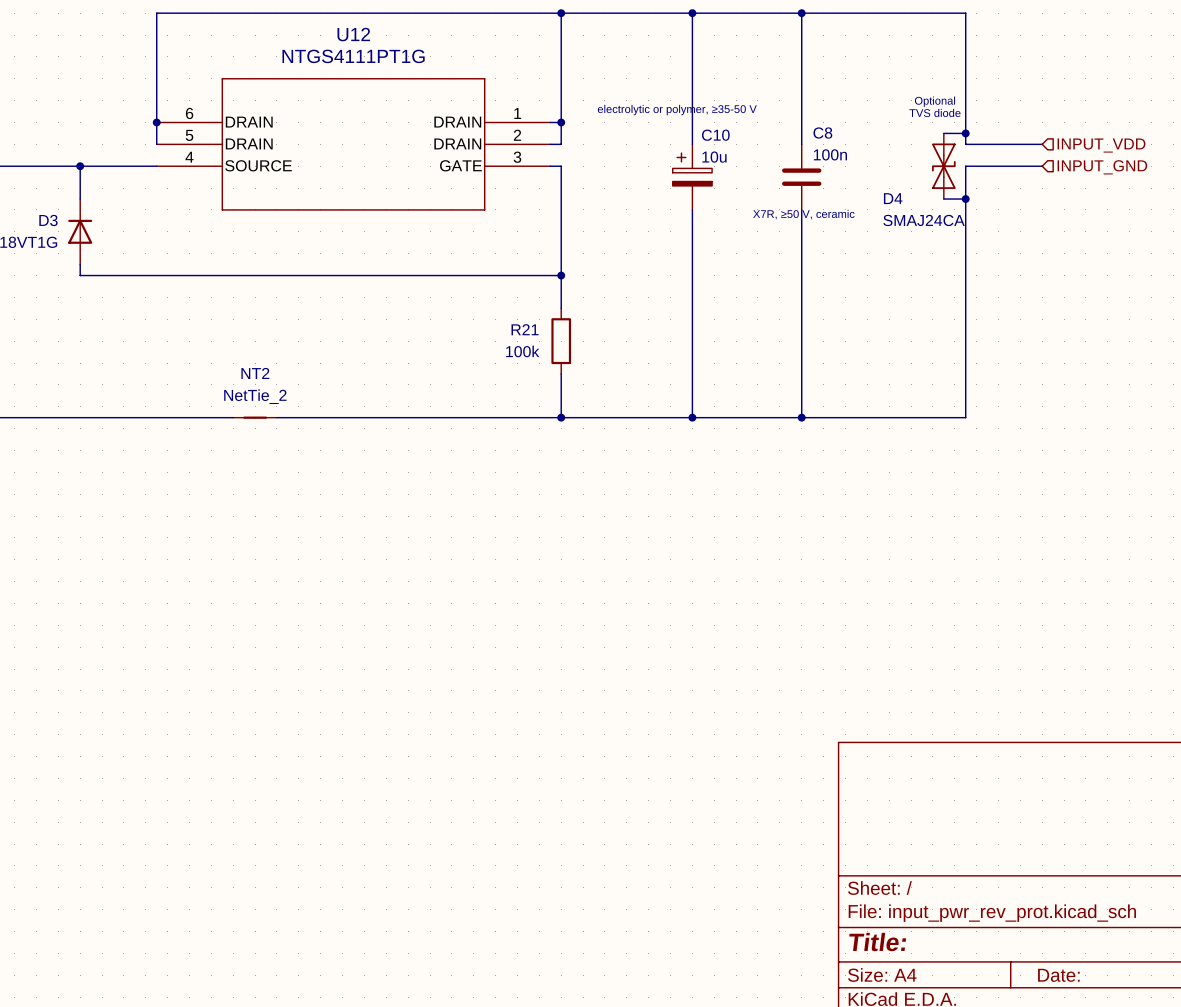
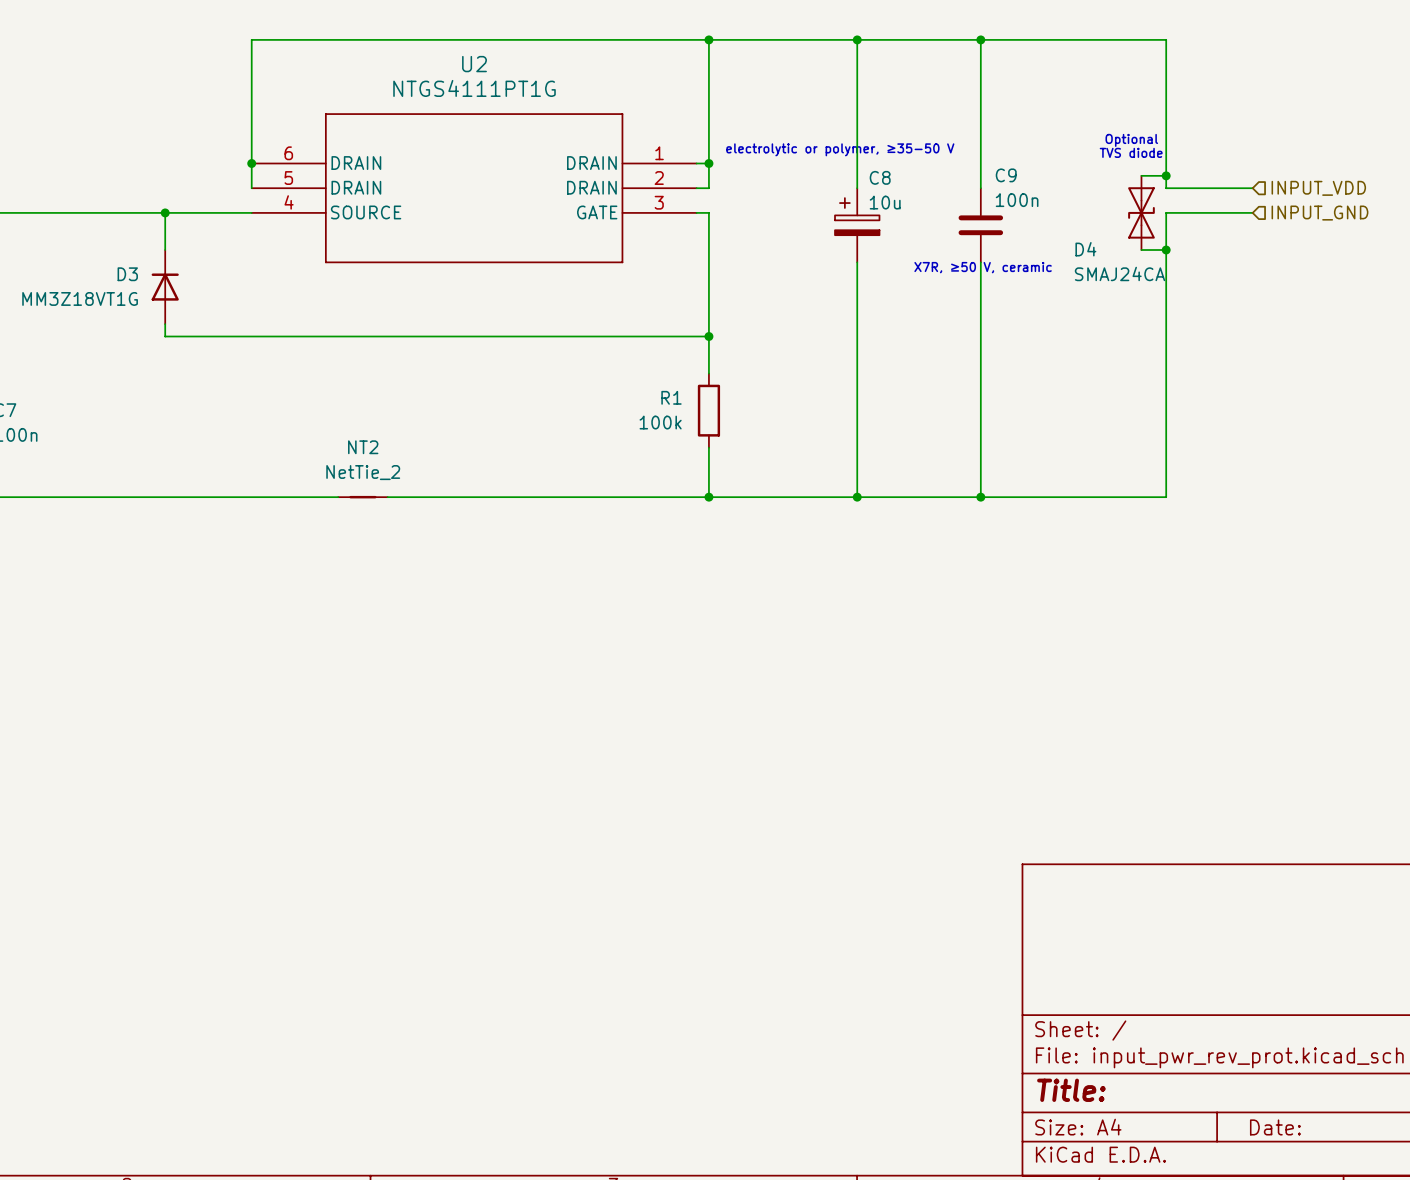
U12 name: U12 (353, 34) -> U2 (474, 64)
C8 name: C8 (822, 133) -> C9 (1006, 175)
C10 name: C10 (715, 135) -> C8 (880, 177)
R21 name: R21 (525, 329) -> R1 (671, 397)

